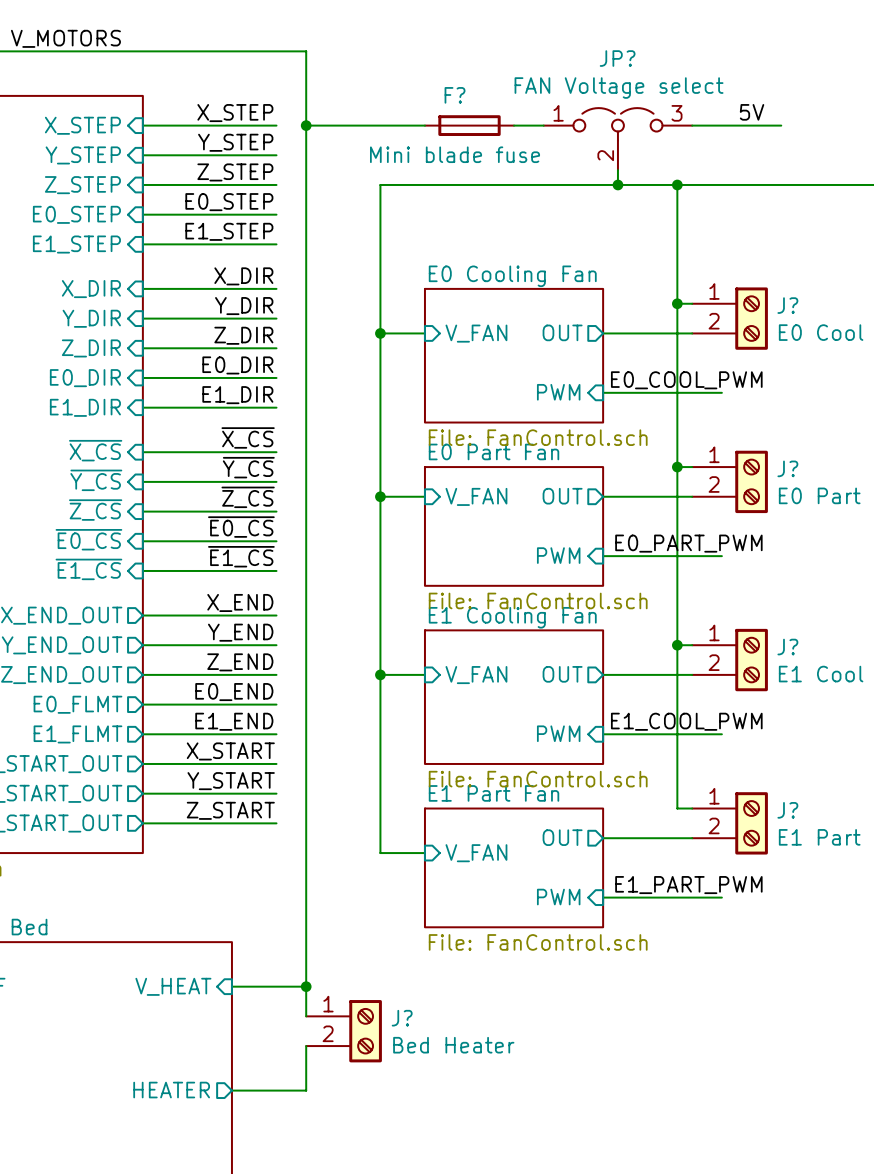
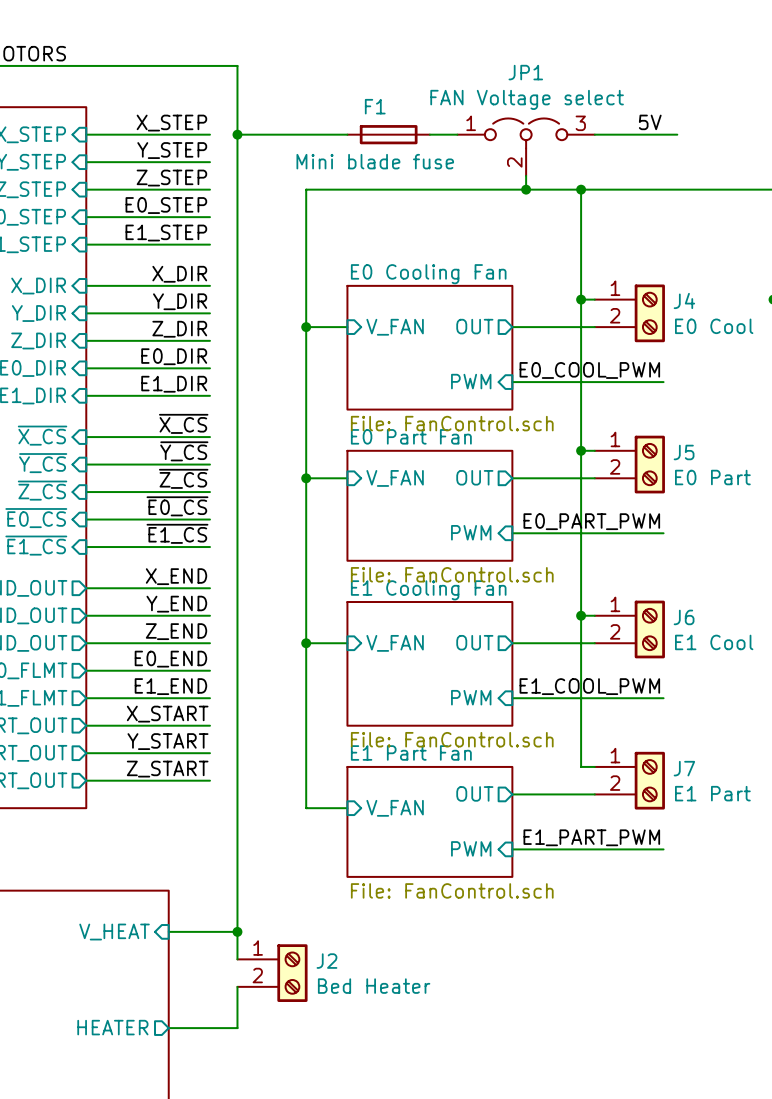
JP? name: JP? (617, 58) -> JP1 (525, 72)
F? name: F? (455, 95) -> F1 (375, 106)
J? name: J? (787, 305) -> J4 (684, 300)
wire: none -> (622, 382) (663, 382)
J? name: J? (787, 468) -> J5 (684, 452)
wire: none -> (622, 533) (663, 533)
J? name: J? (787, 647) -> J6 (684, 617)
wire: none -> (622, 698) (663, 698)
J? name: J? (787, 810) -> J7 (684, 768)
wire: none -> (622, 849) (663, 849)
J? name: J? (402, 1018) -> J2 (326, 961)

